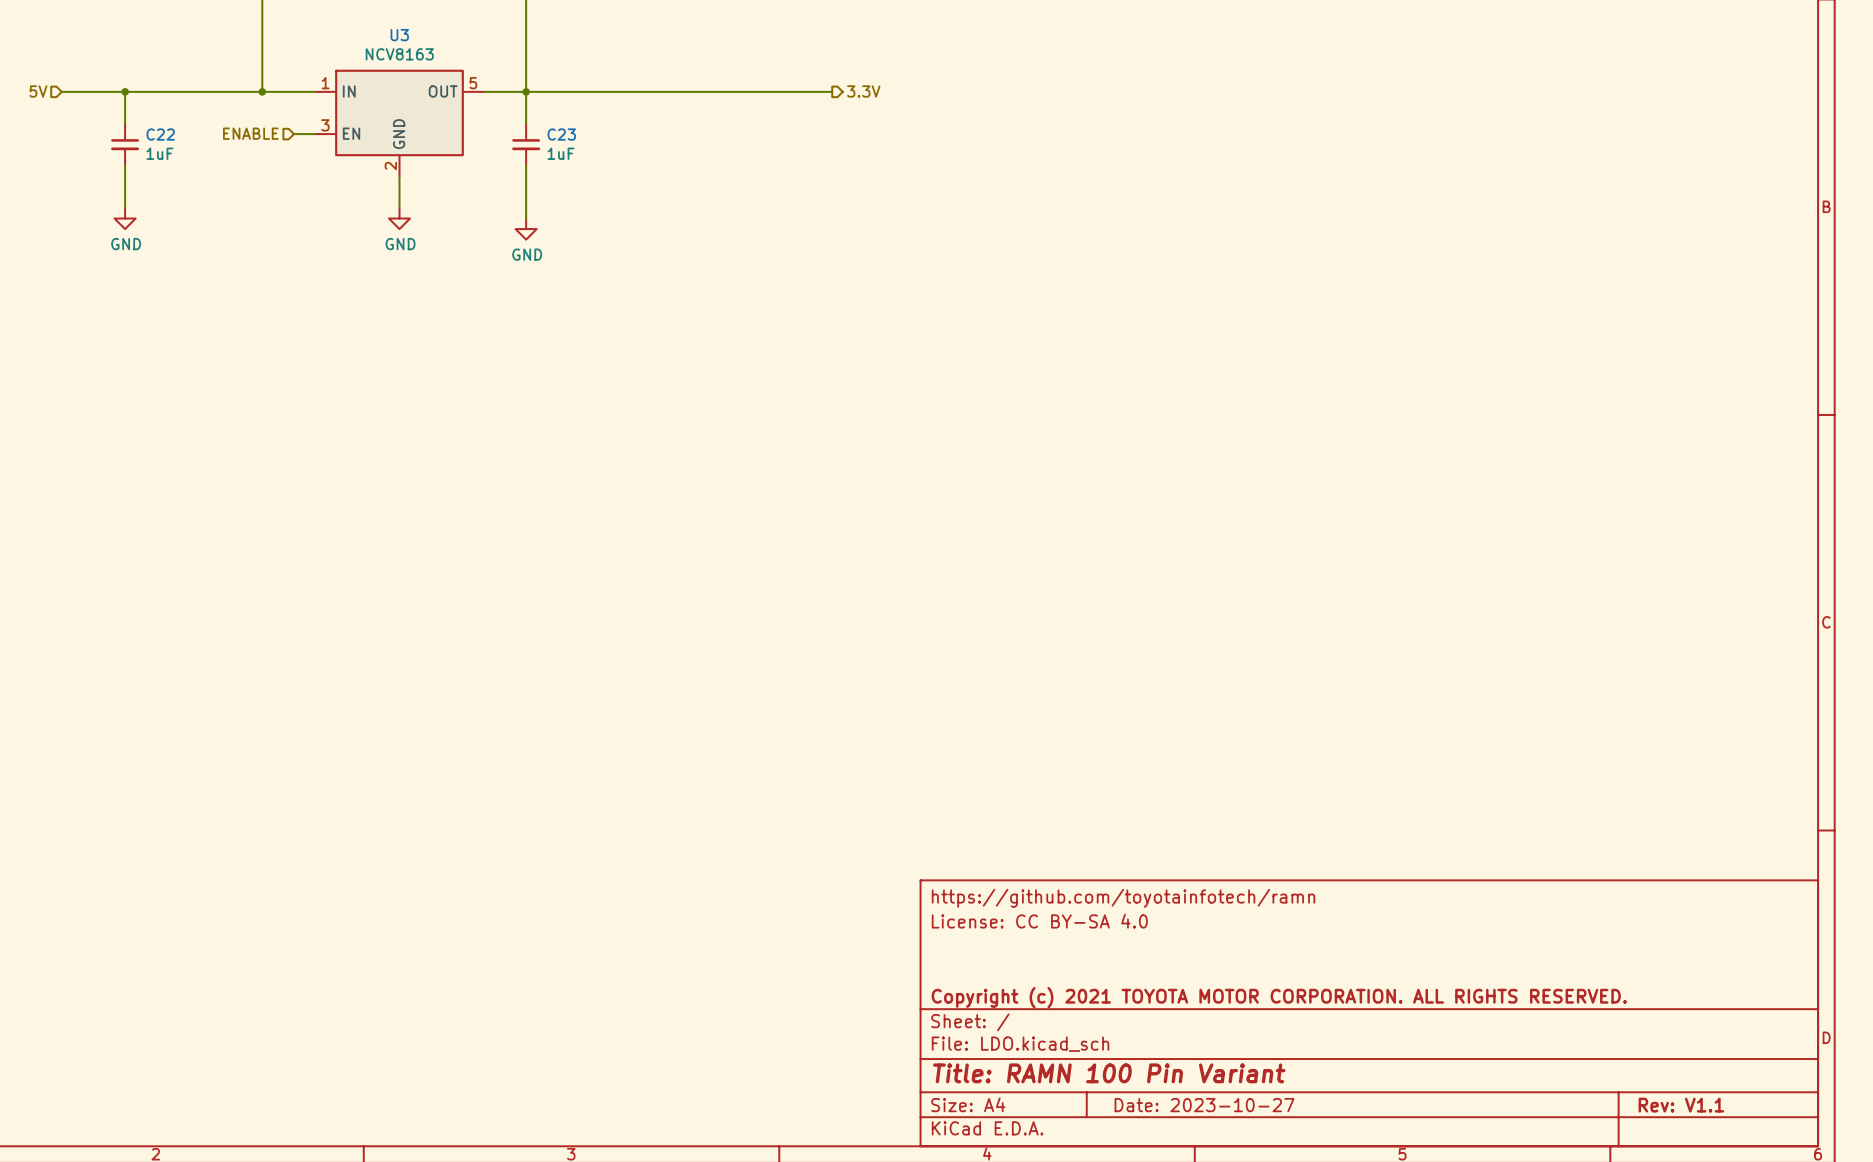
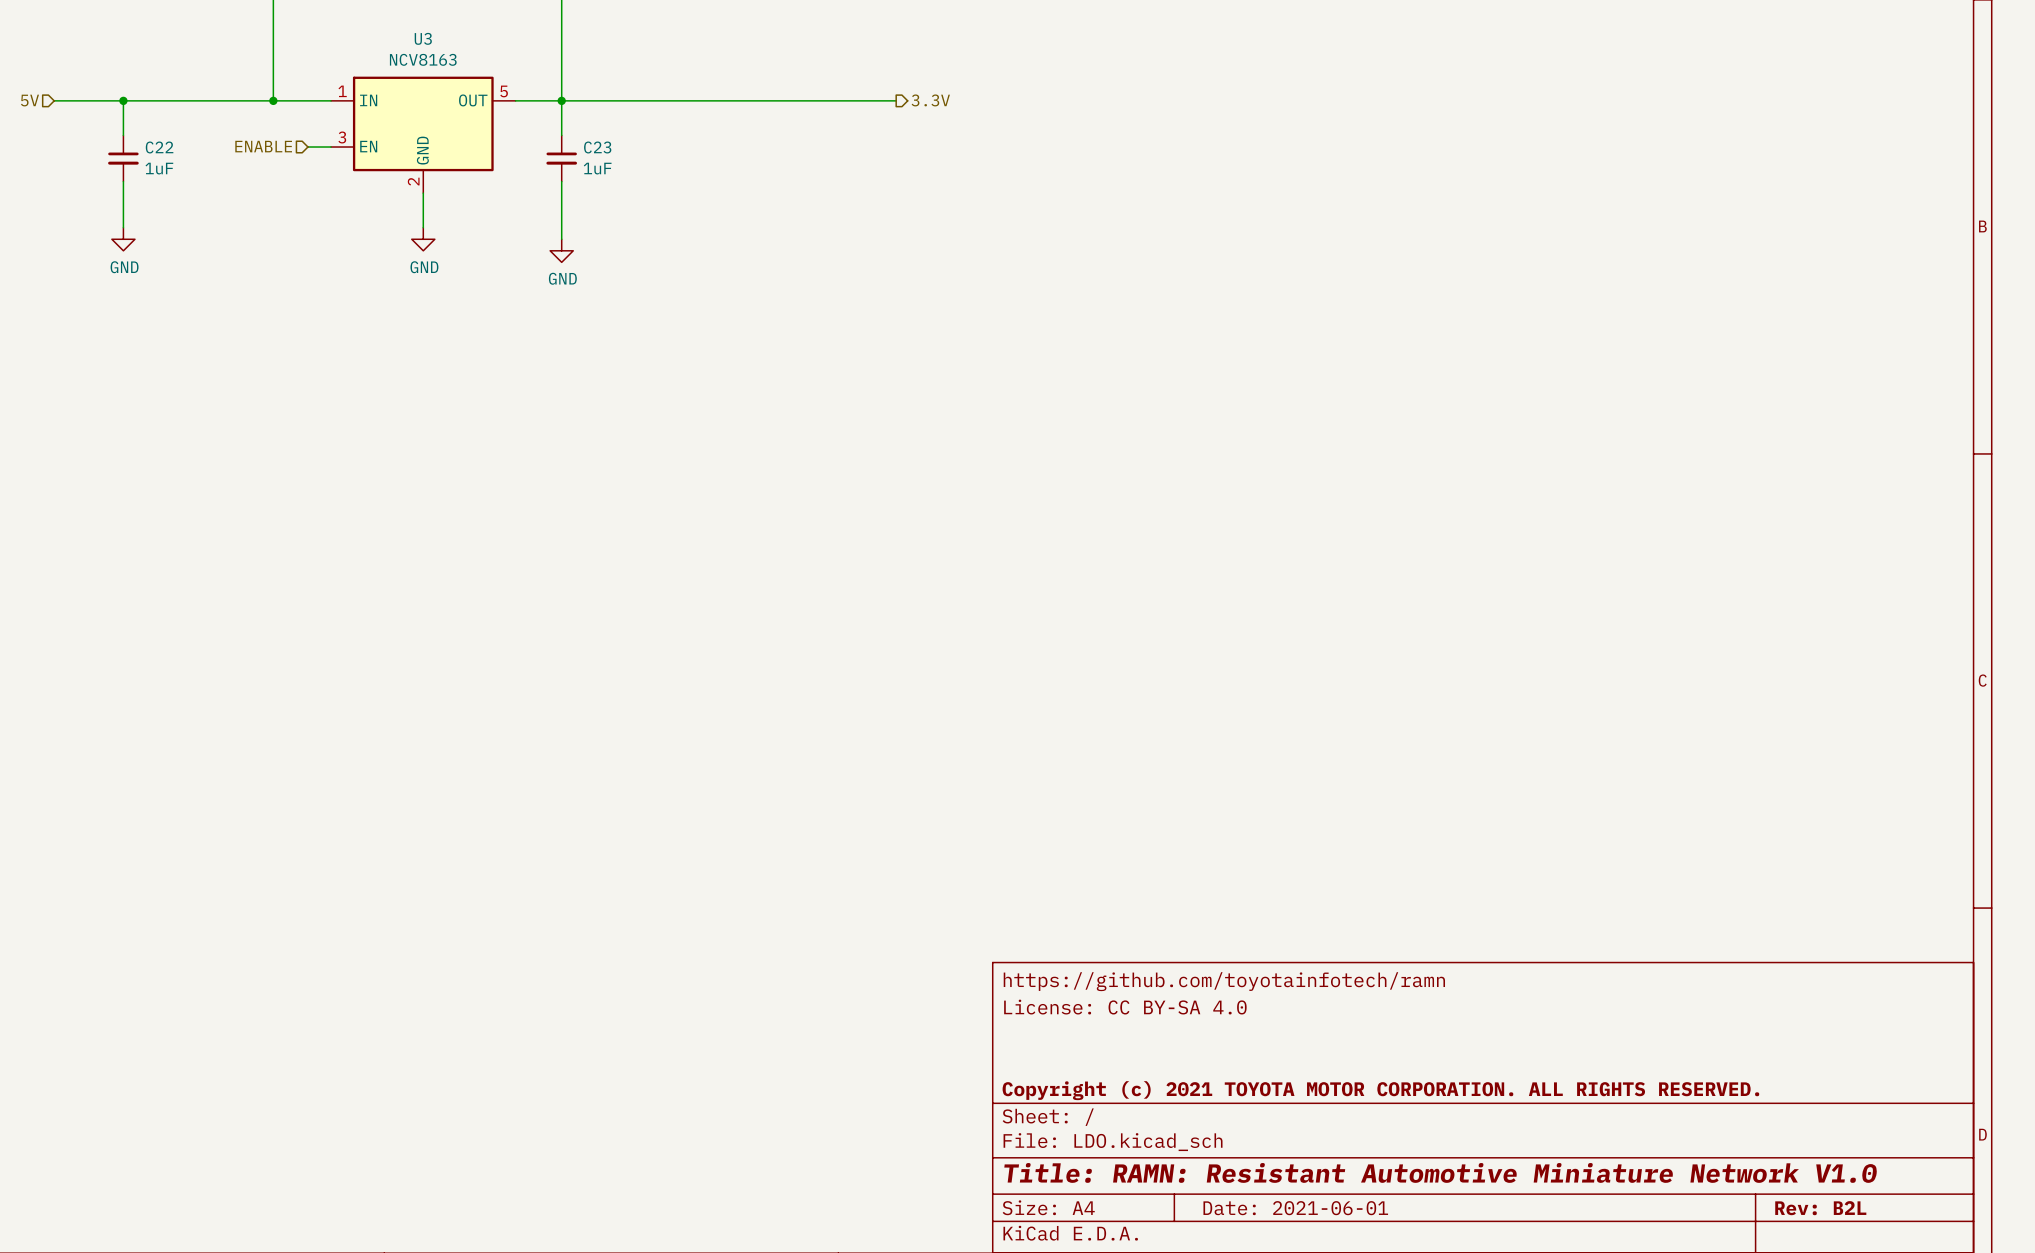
title block: Title: RAMN 100 Pin Variant (1109, 1073) -> Title: RAMN: Resistant Automotive Miniature Network V1.0 (1440, 1172)
title block: Date: 2023-10-27 (1204, 1105) -> Date: 2021-06-01 (1295, 1208)
title block: Rev: V1.1 (1681, 1105) -> Rev: B2L (1820, 1208)

